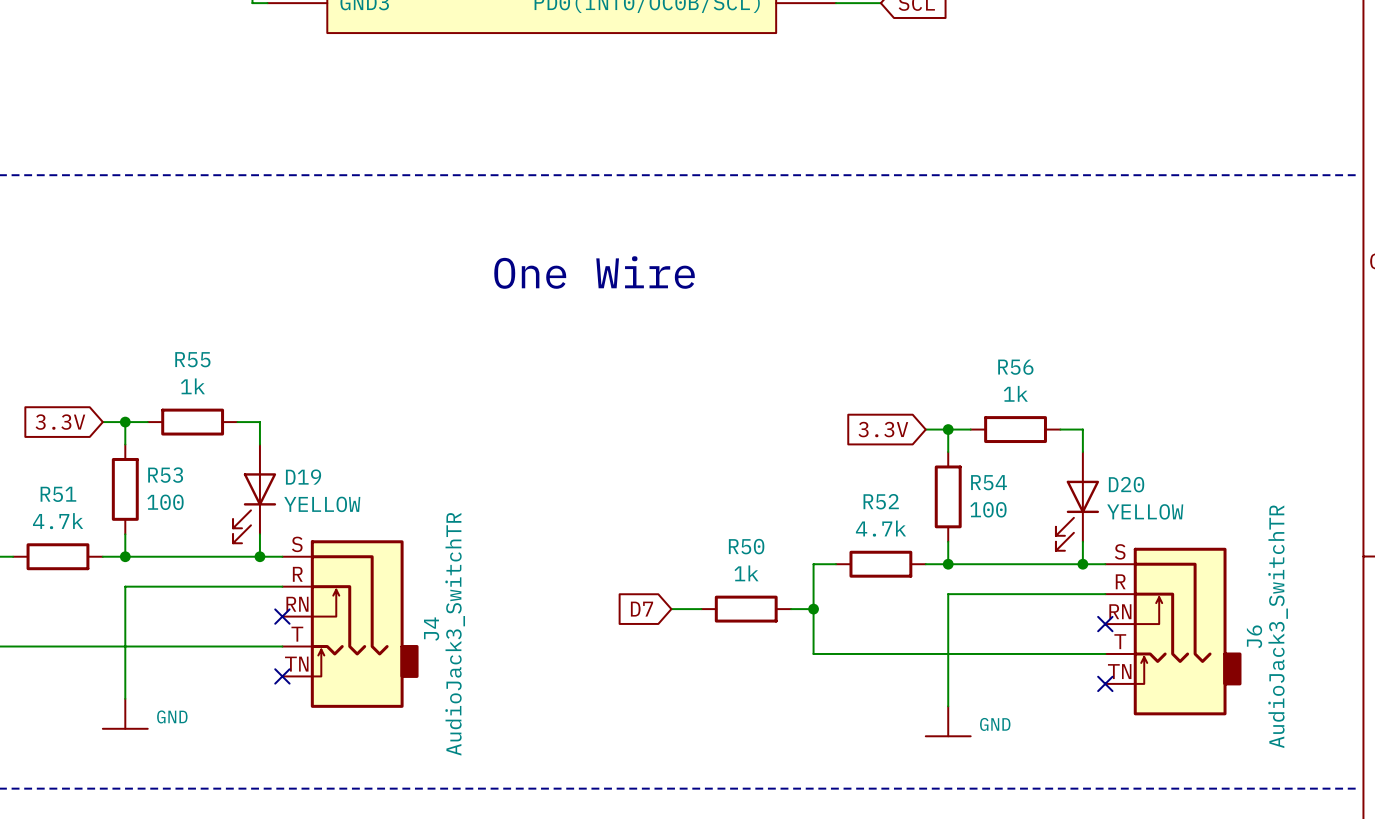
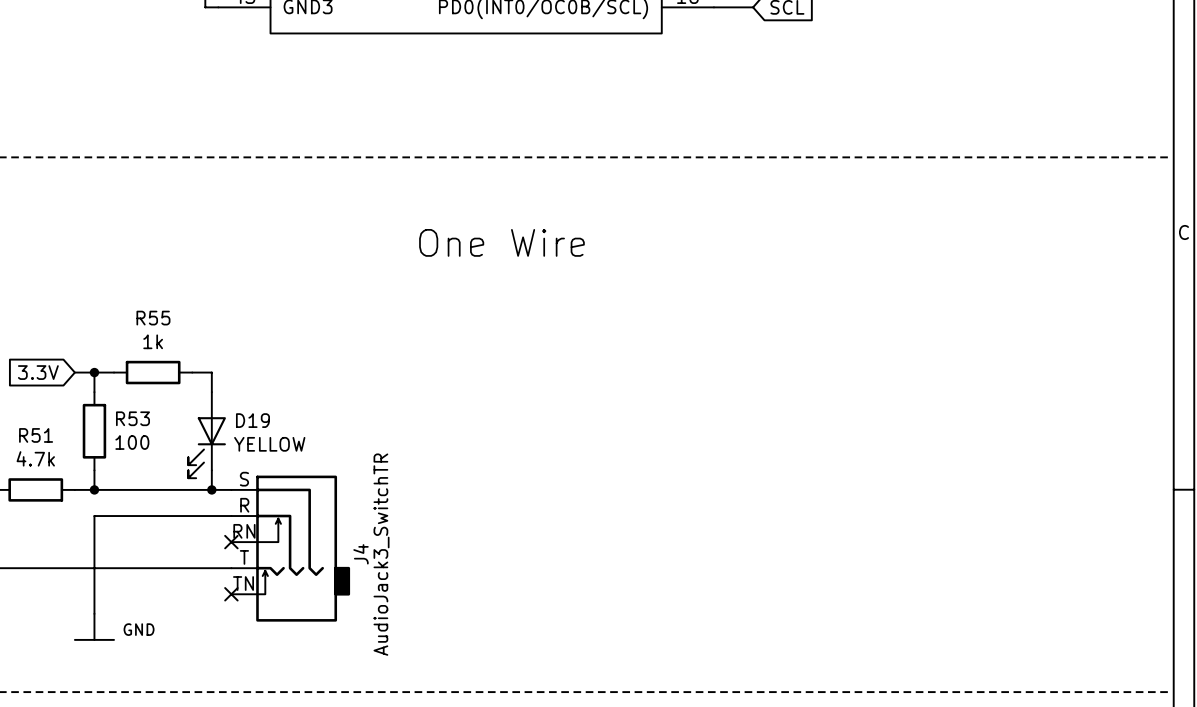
global label: 3.3V (883, 429) -> none
wire: (925, 429) (970, 429) -> none
wire: (948, 429) (948, 452) -> none
junction: (948, 429) -> none
R56: 1k (1015, 429) -> none
wire: (1060, 429) (1082, 429) (1082, 452) -> none
R54: 100 (948, 496) -> none
D20: YELLOW (1077, 501) -> none
wire: (948, 541) (948, 564) -> none
wire: (1082, 541) (1082, 564) -> none
wire: (836, 564) (813, 564) (813, 653) (1105, 653) -> none
R52: 4.7k (880, 564) -> none
wire: (925, 564) (1105, 564) -> none
junction: (948, 564) -> none
junction: (1082, 564) -> none
wire: (1105, 594) (948, 594) (948, 706) -> none
global label: D7 (642, 609) -> none
wire: (671, 609) (701, 609) -> none
R50: 1k (746, 609) -> none
wire: (791, 609) (813, 609) -> none
junction: (813, 609) -> none
no-connect mark: (1105, 624) -> none
J6: AudioJack3_SwitchTR (1173, 631) -> none
no-connect mark: (1105, 683) -> none
power symbol: GND (948, 721) -> none

